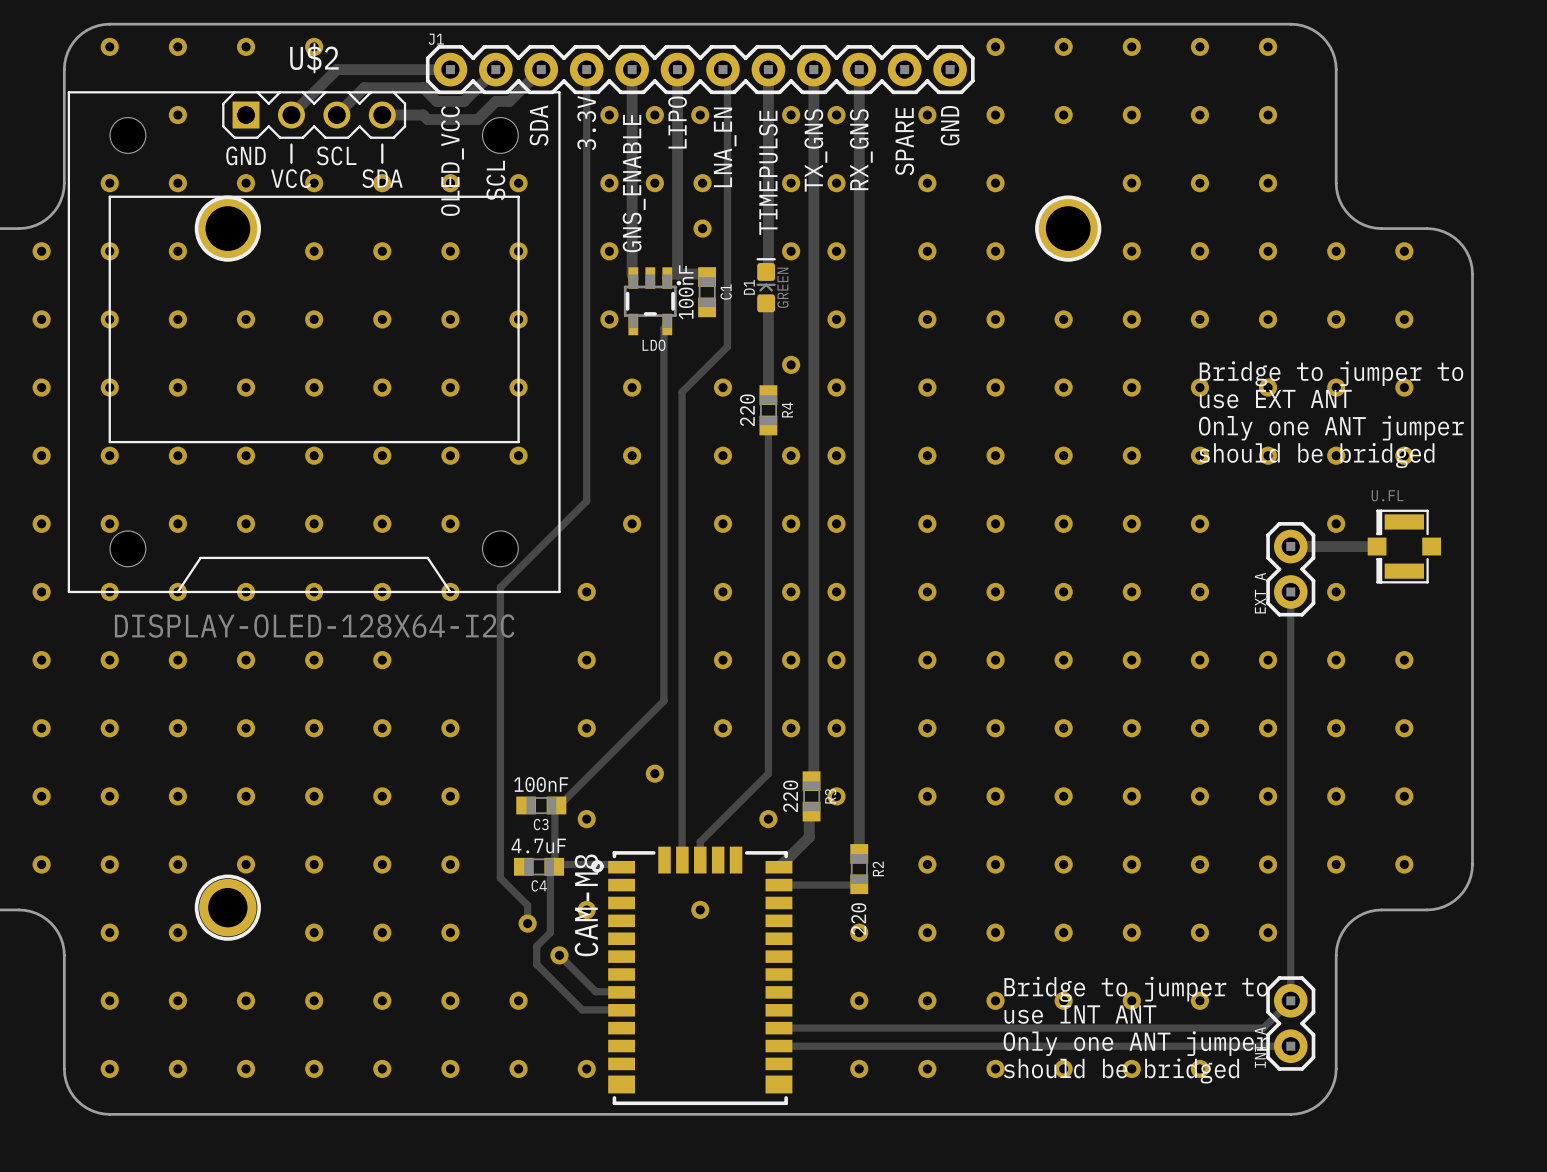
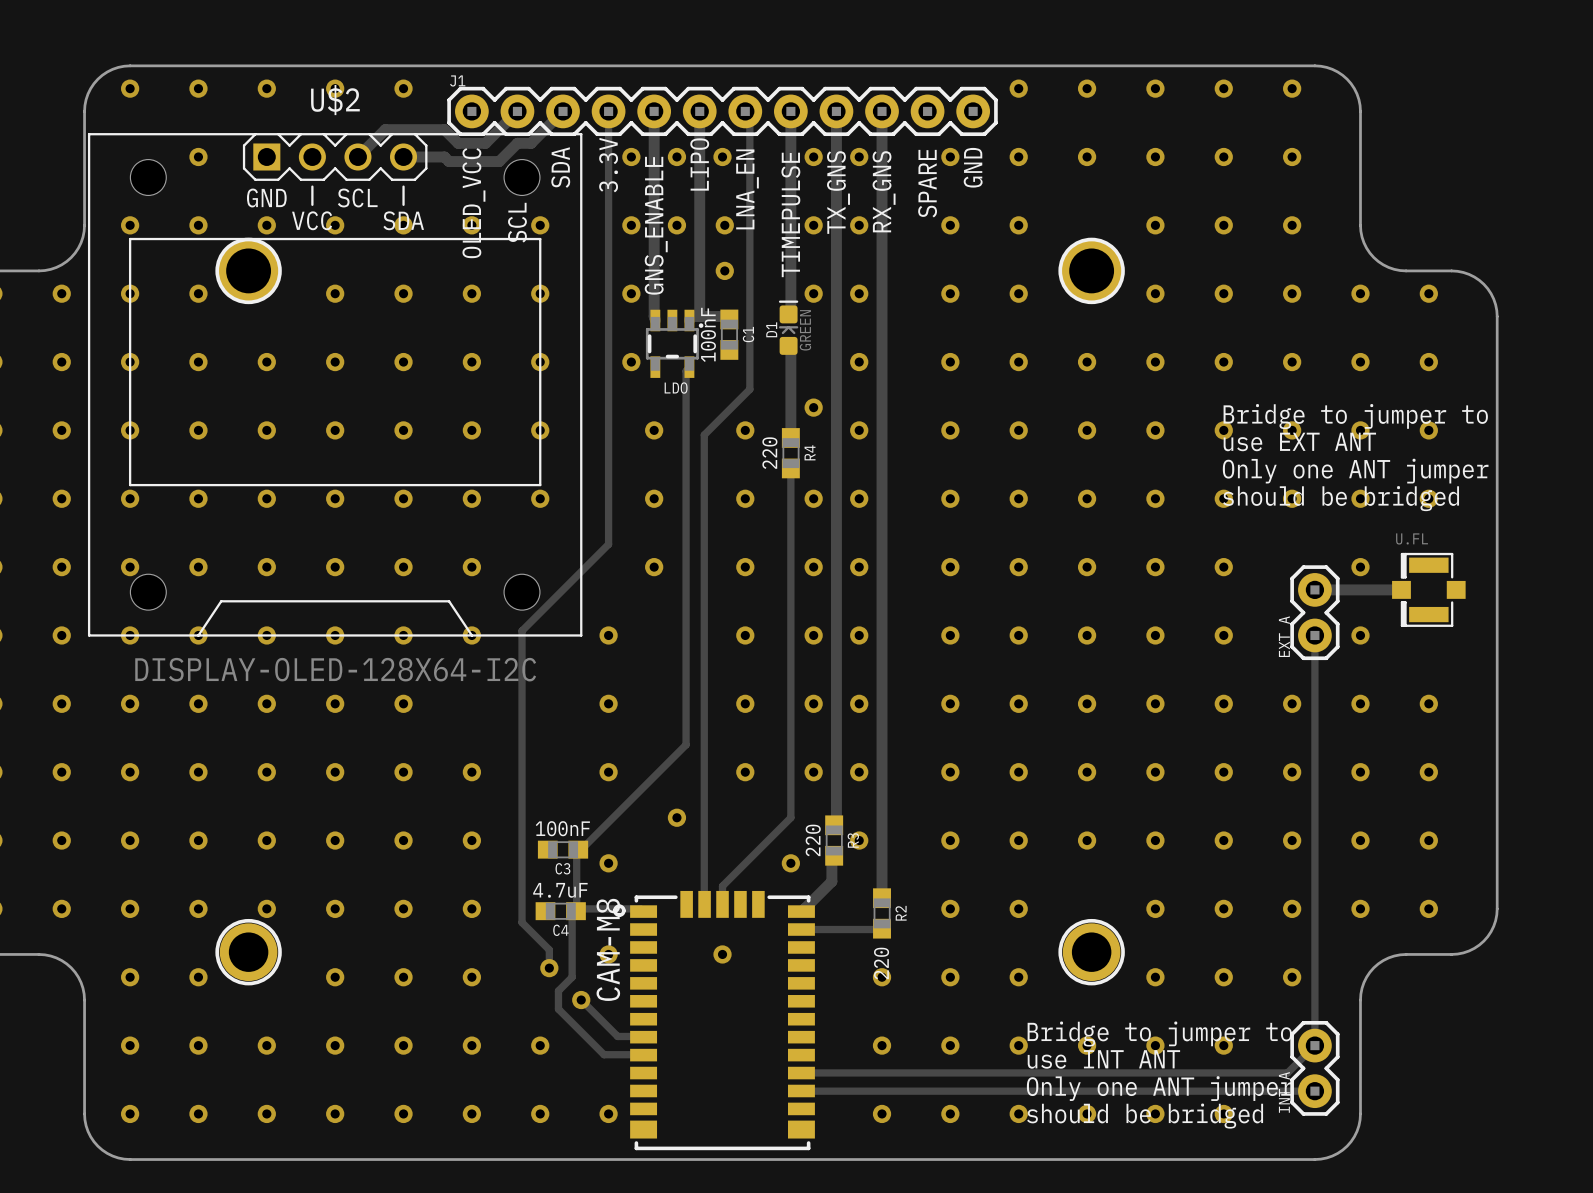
via: none -> (403, 88)
track: (450, 69) (336, 69) (291, 115) -> none
via: (1063, 864) -> none
part: none -> (1091, 952)
via: (1063, 932) -> none

